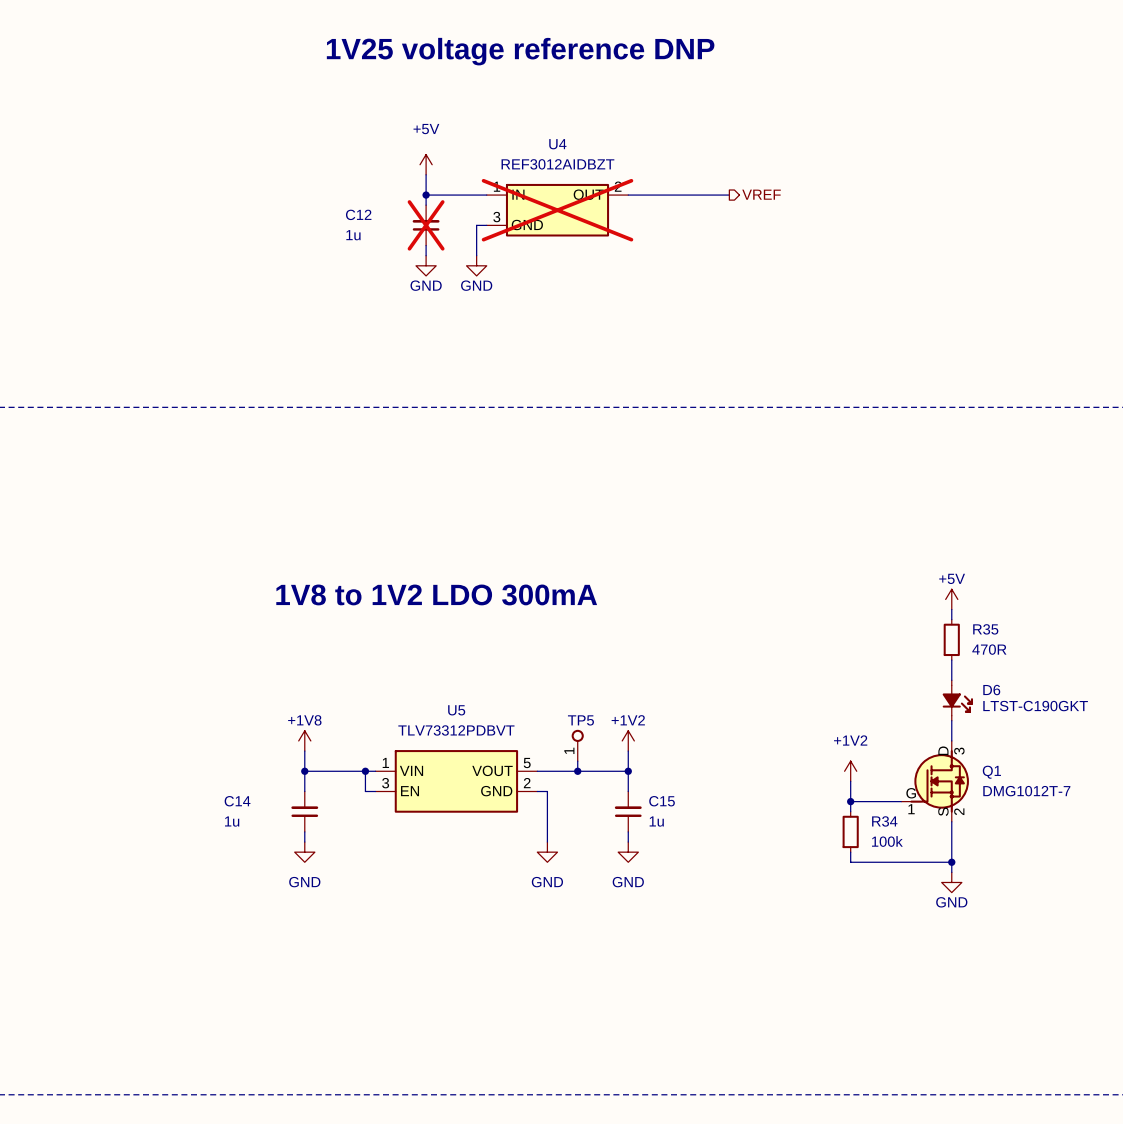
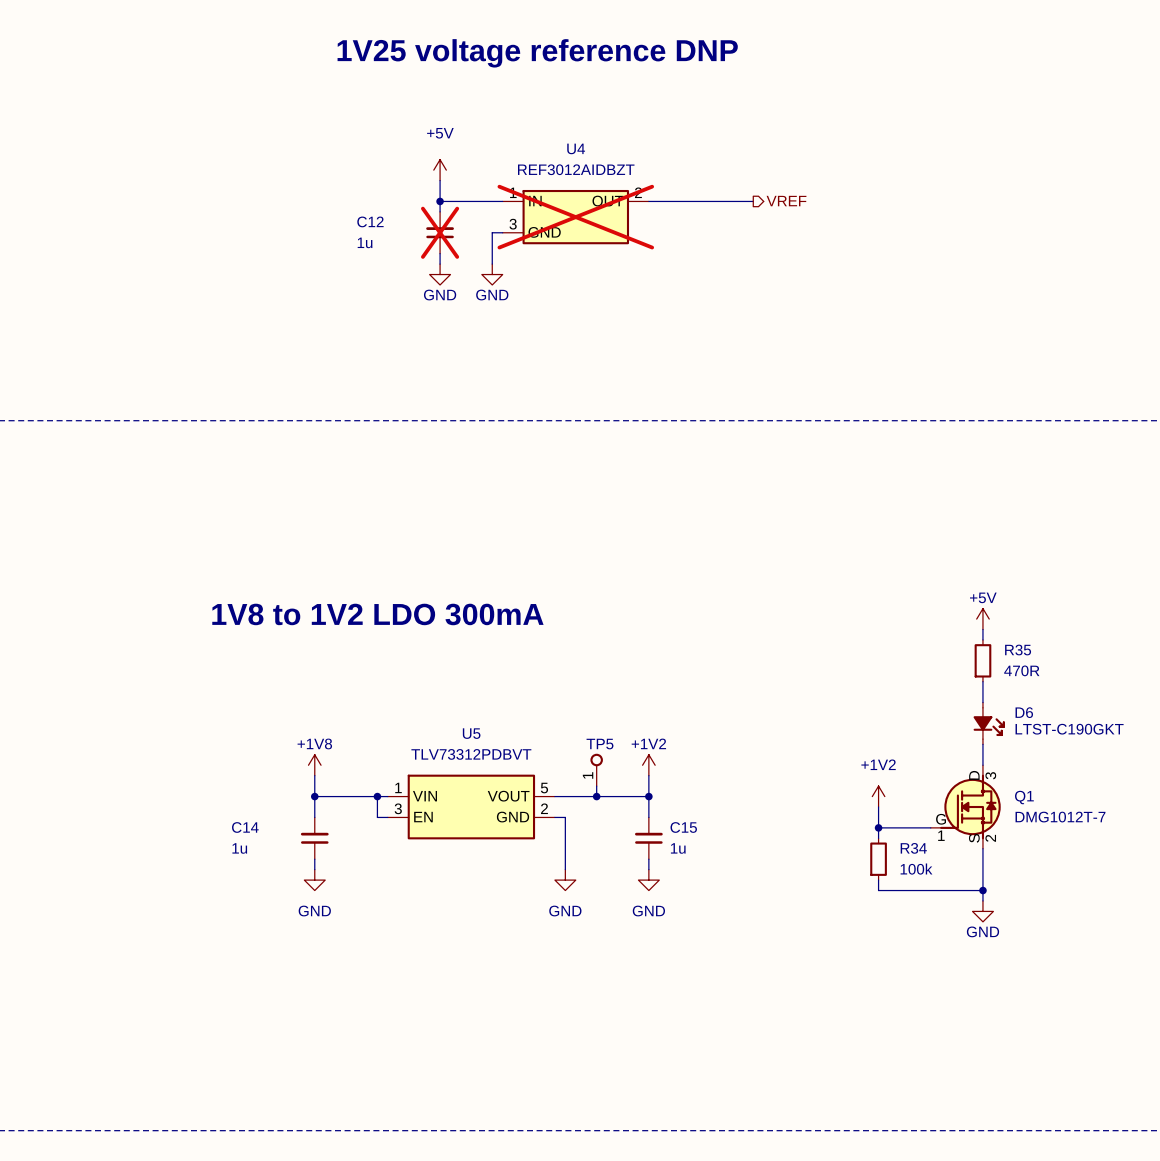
text position: 1V8 to 1V2 LDO 300mA (436, 594) -> 1V8 to 1V2 LDO 300mA (377, 614)

